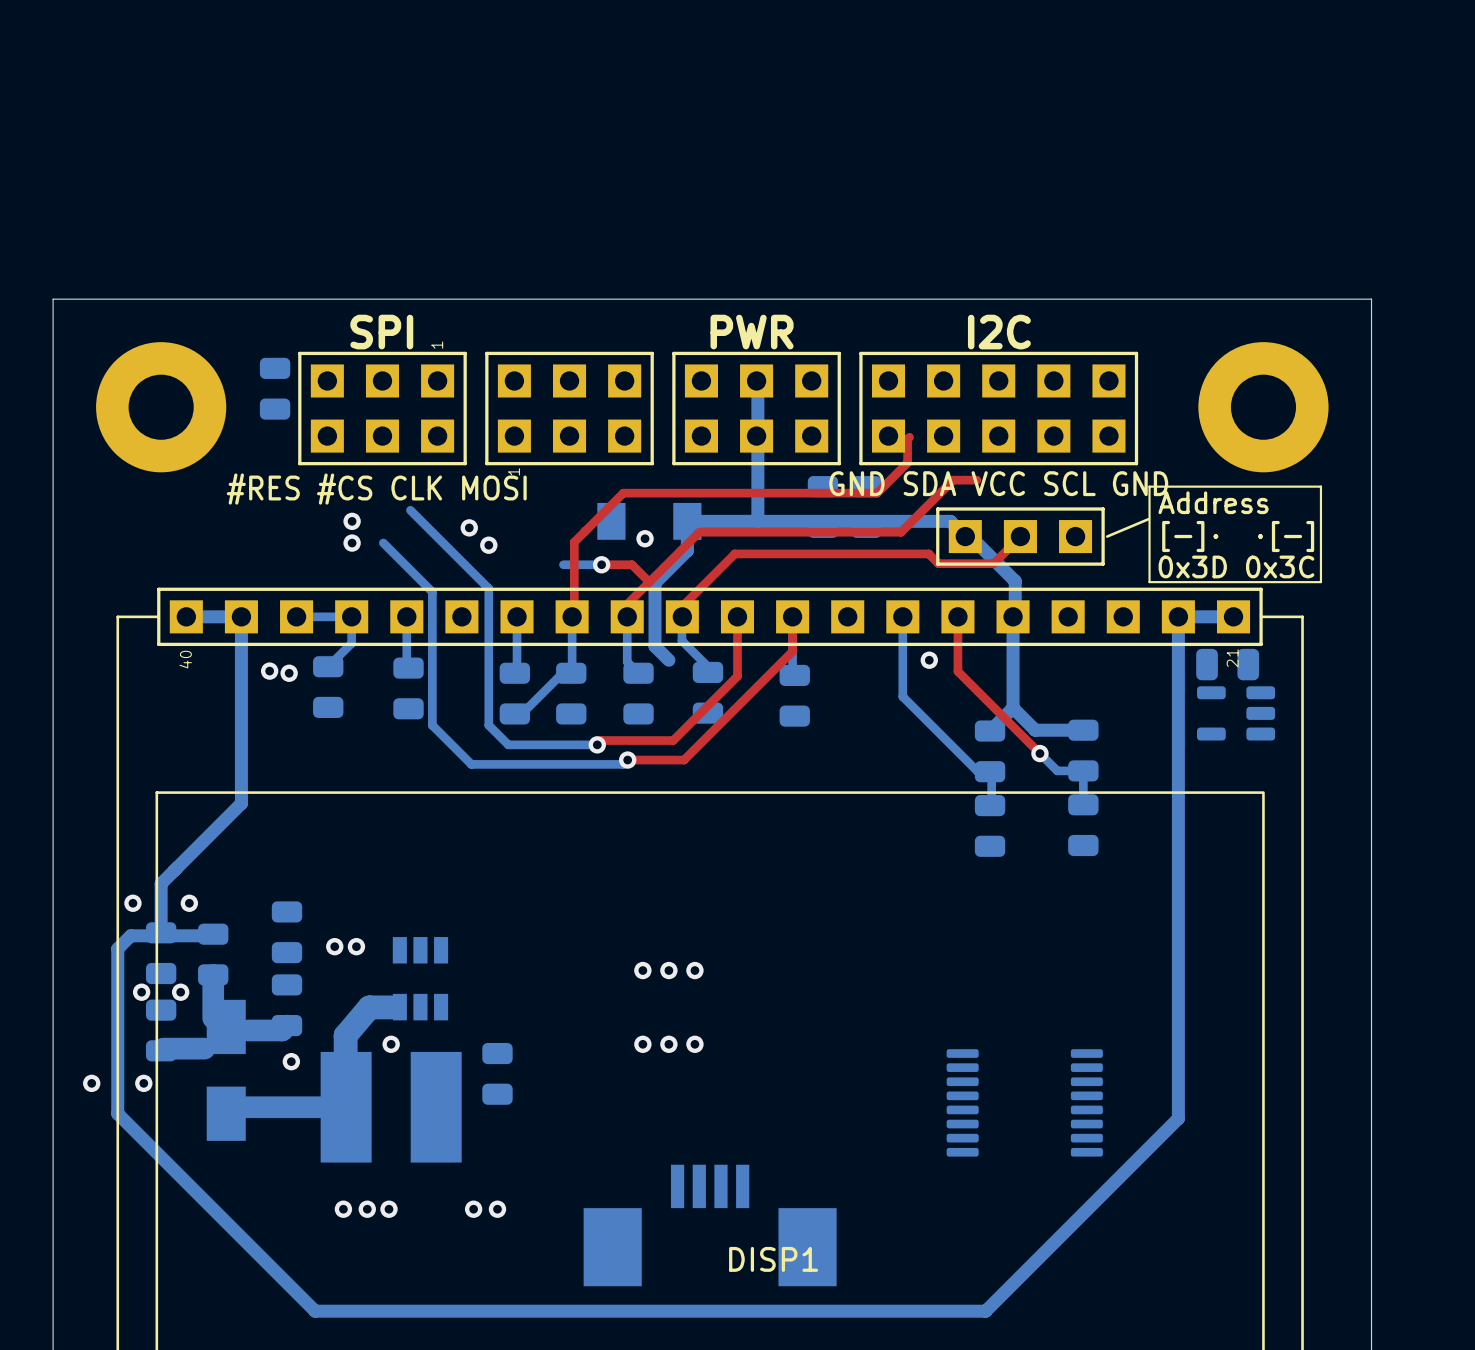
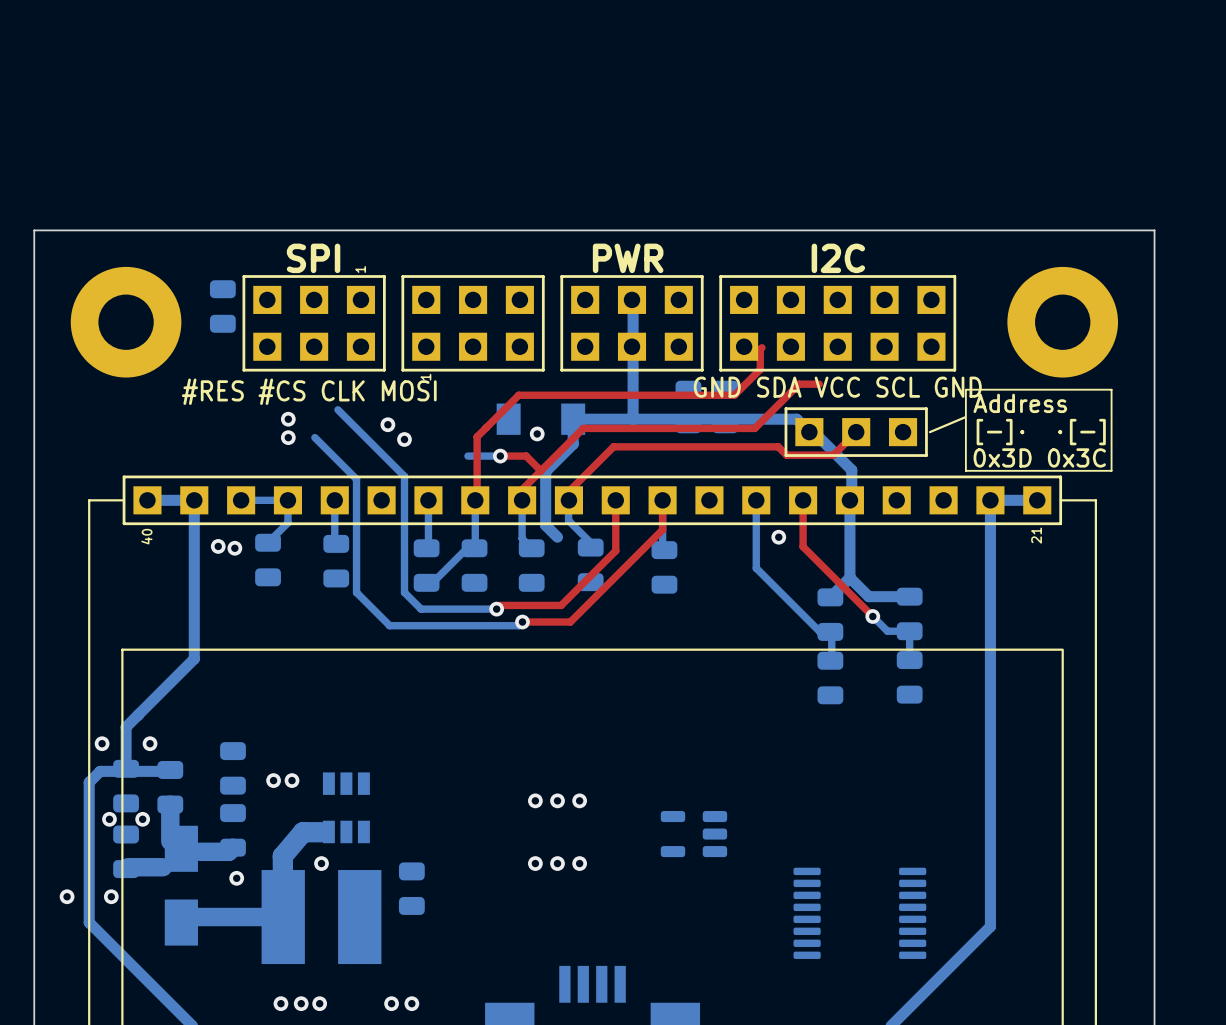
part: (1227, 664) -> none
part position: (1236, 713) -> (693, 834)

